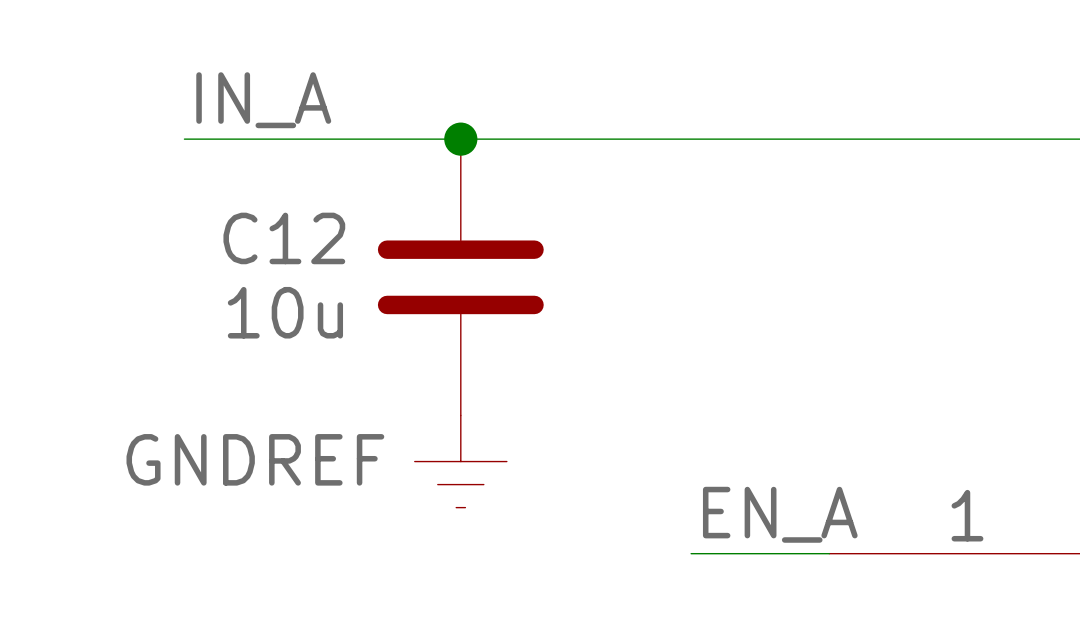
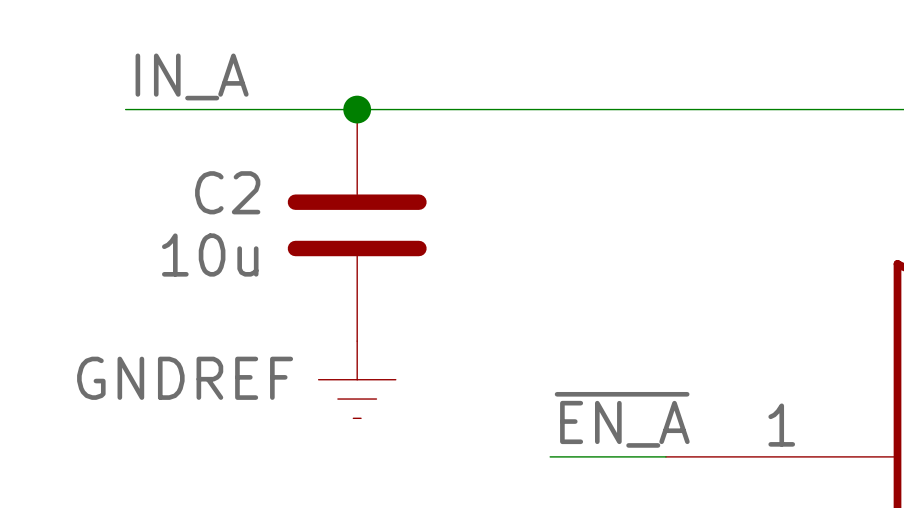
C12 name: C12 (284, 238) -> C2 (227, 192)
label: EN_A (780, 514) -> ~{EN_A} (622, 419)

